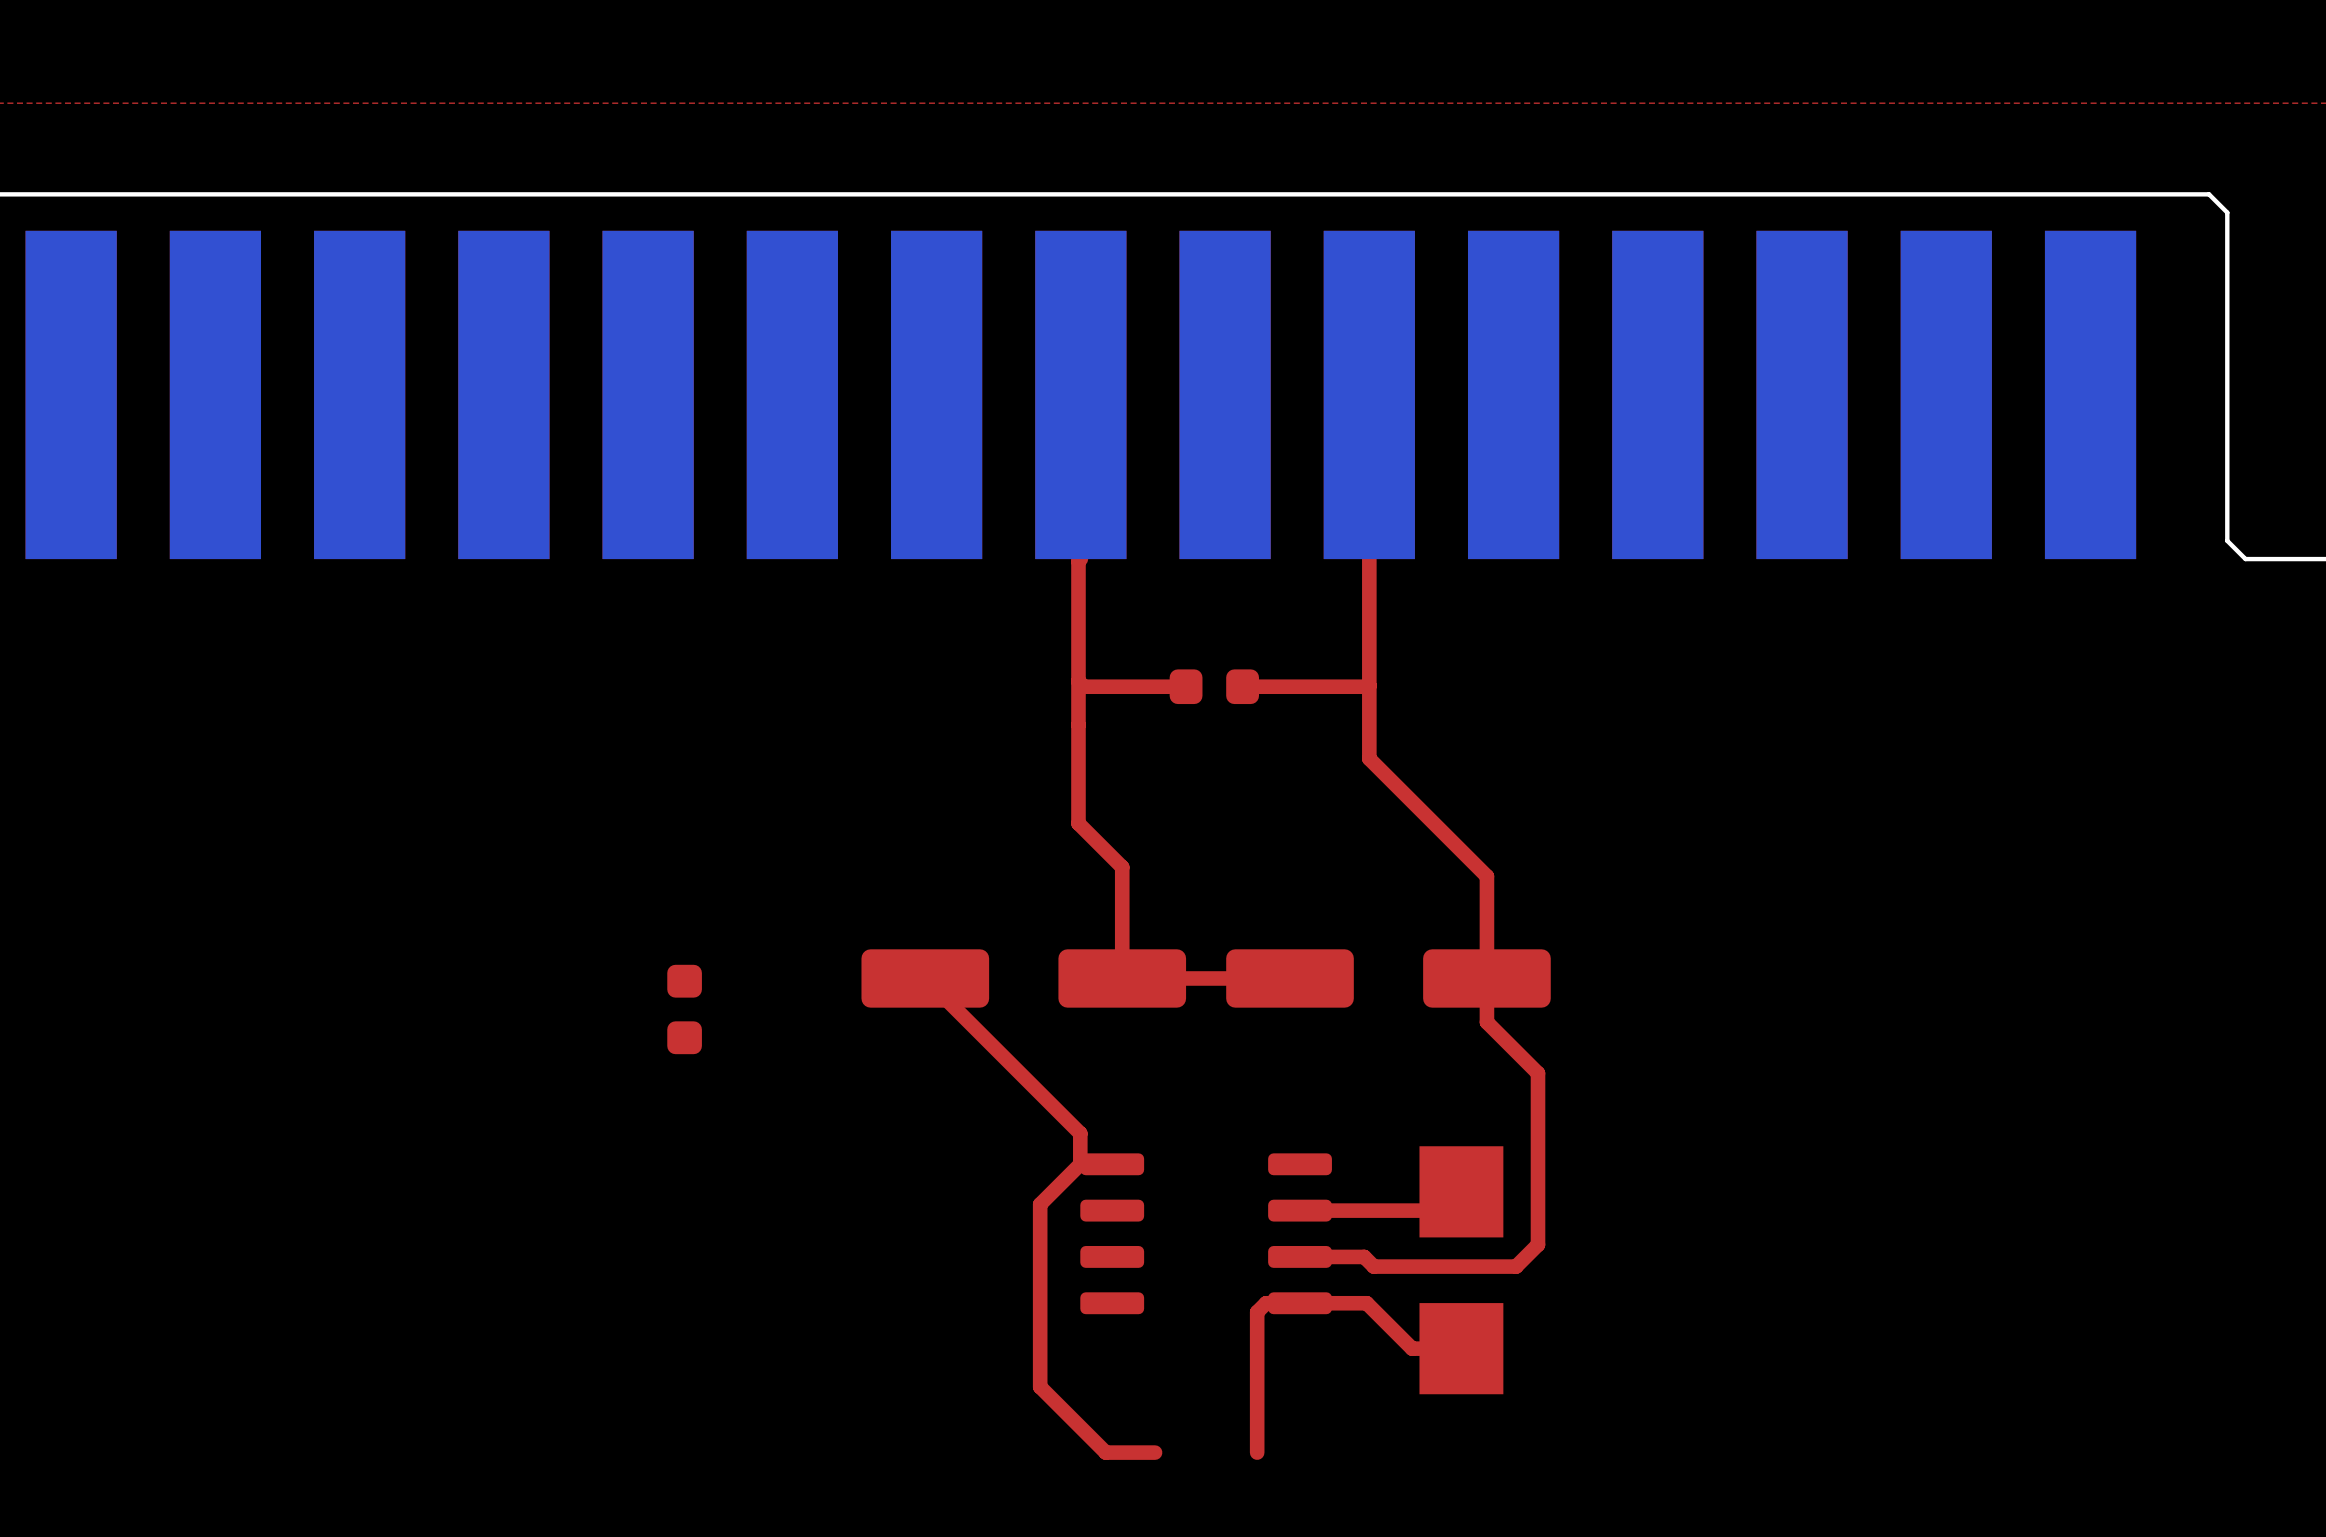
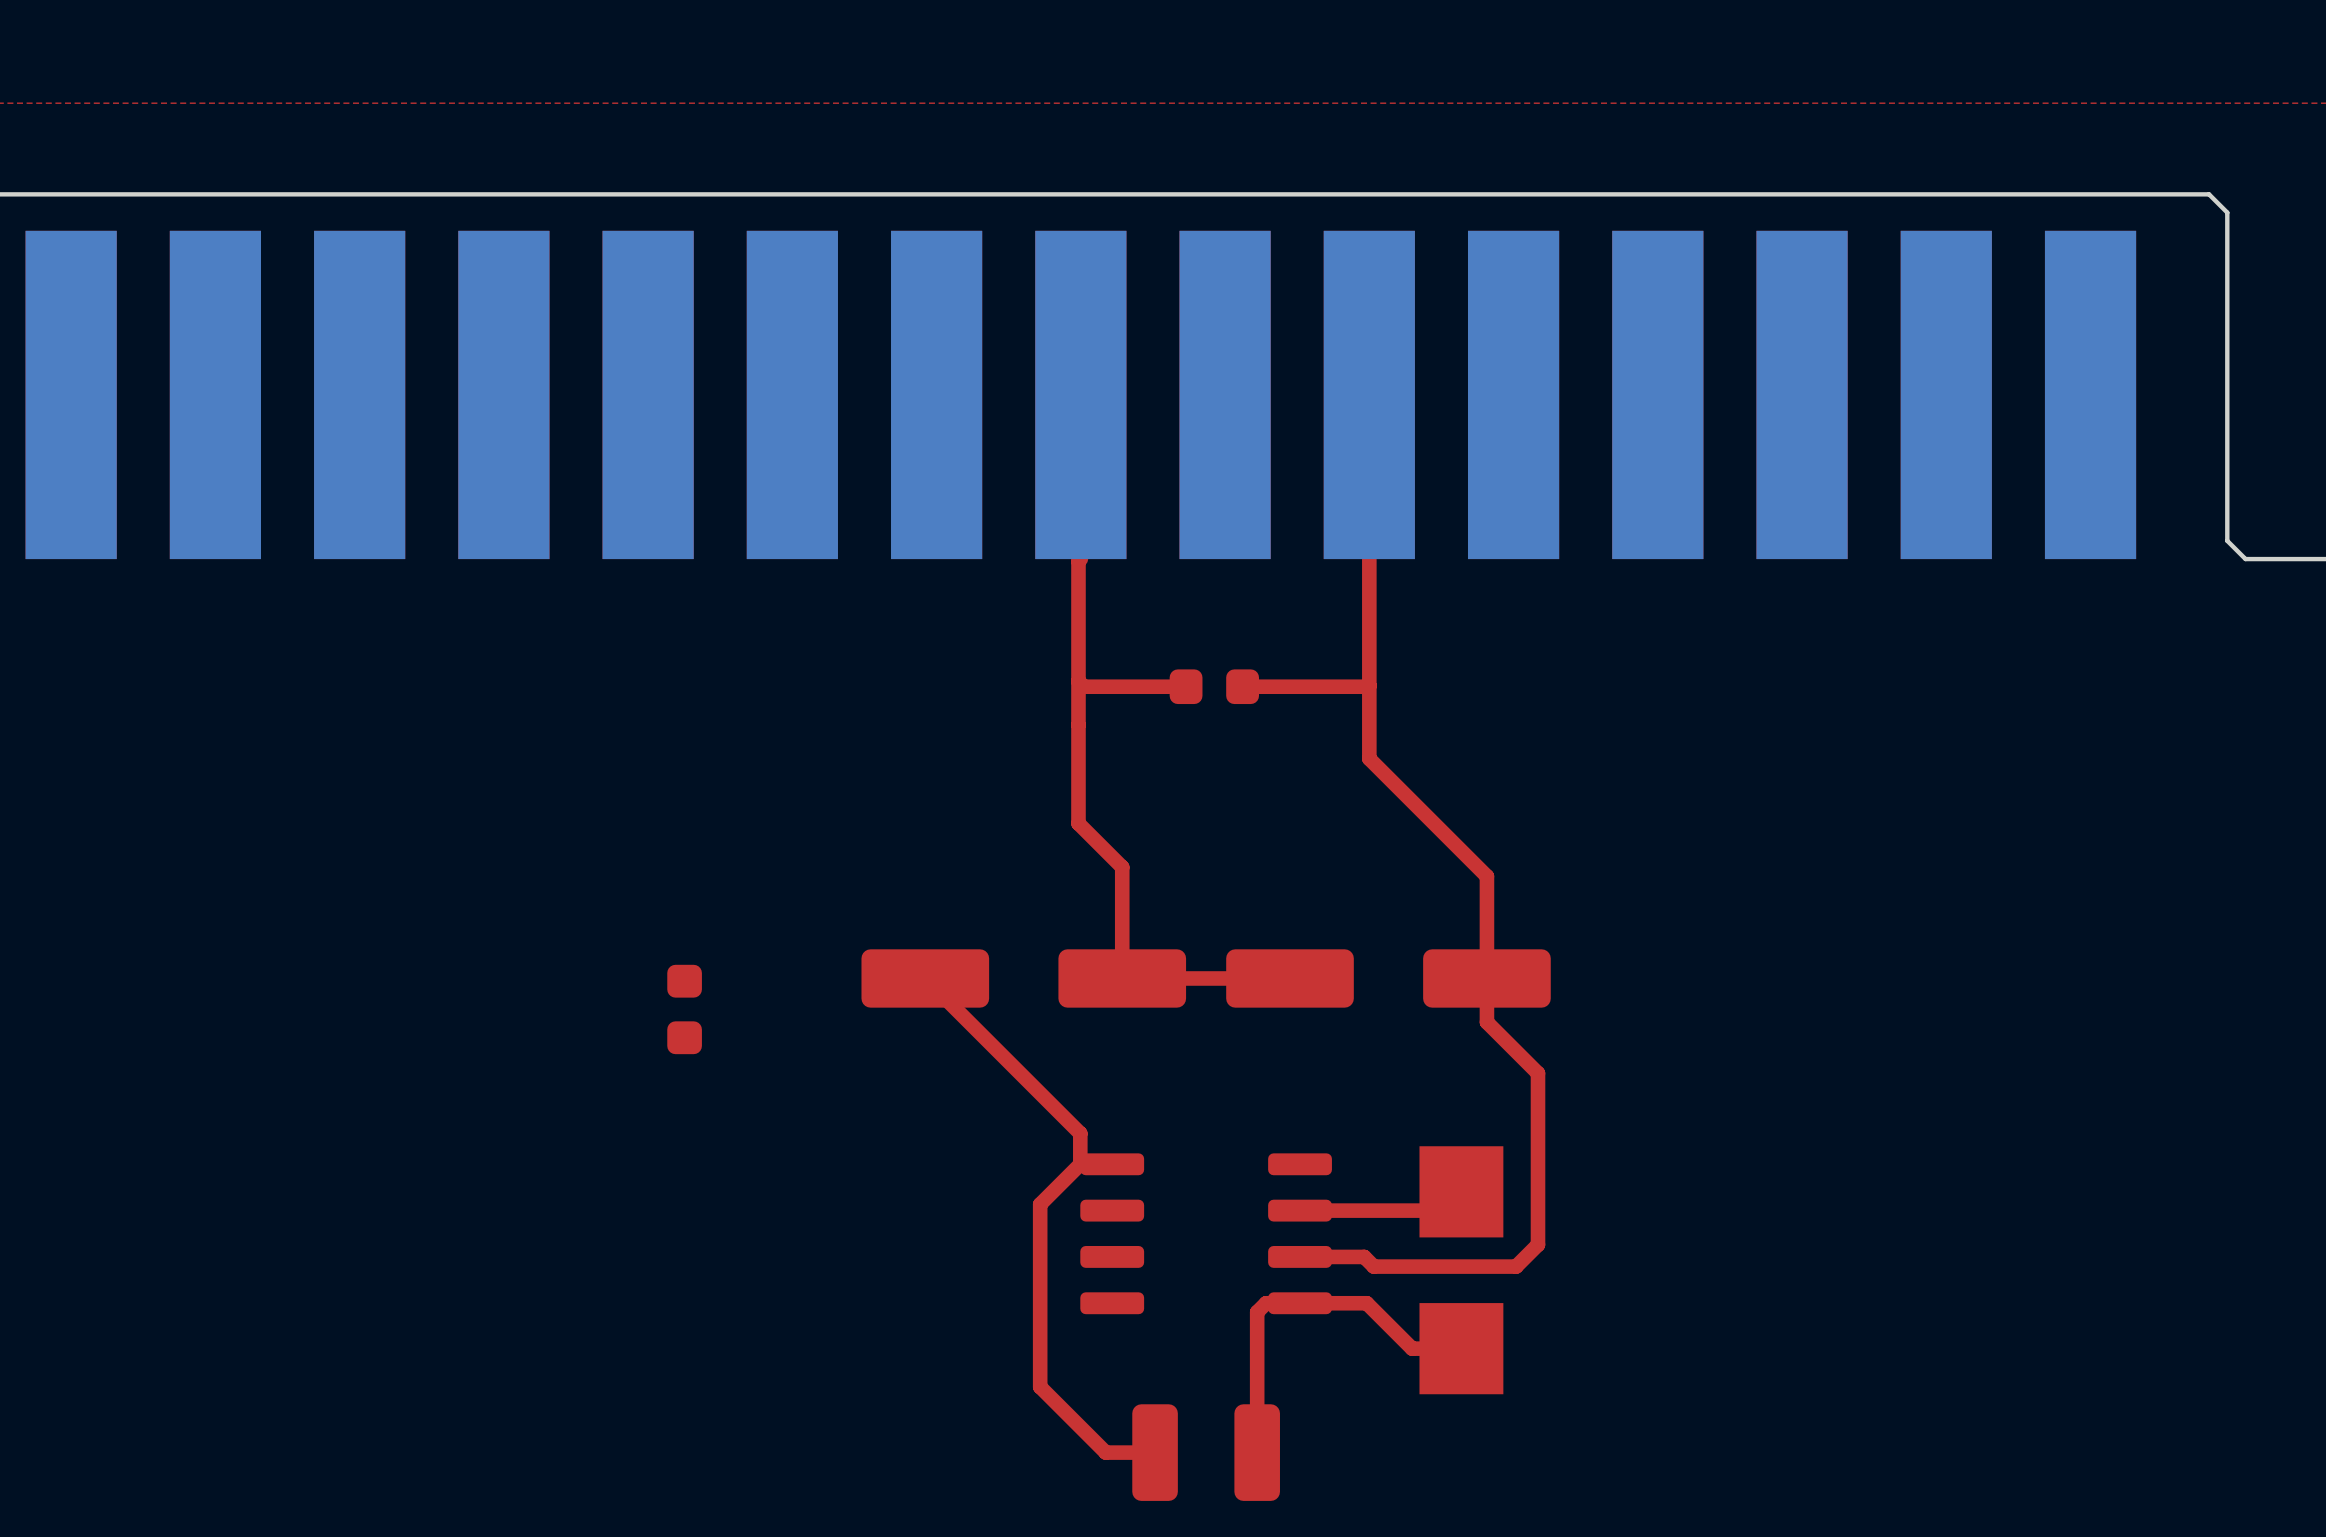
part: none -> (1206, 1452)

